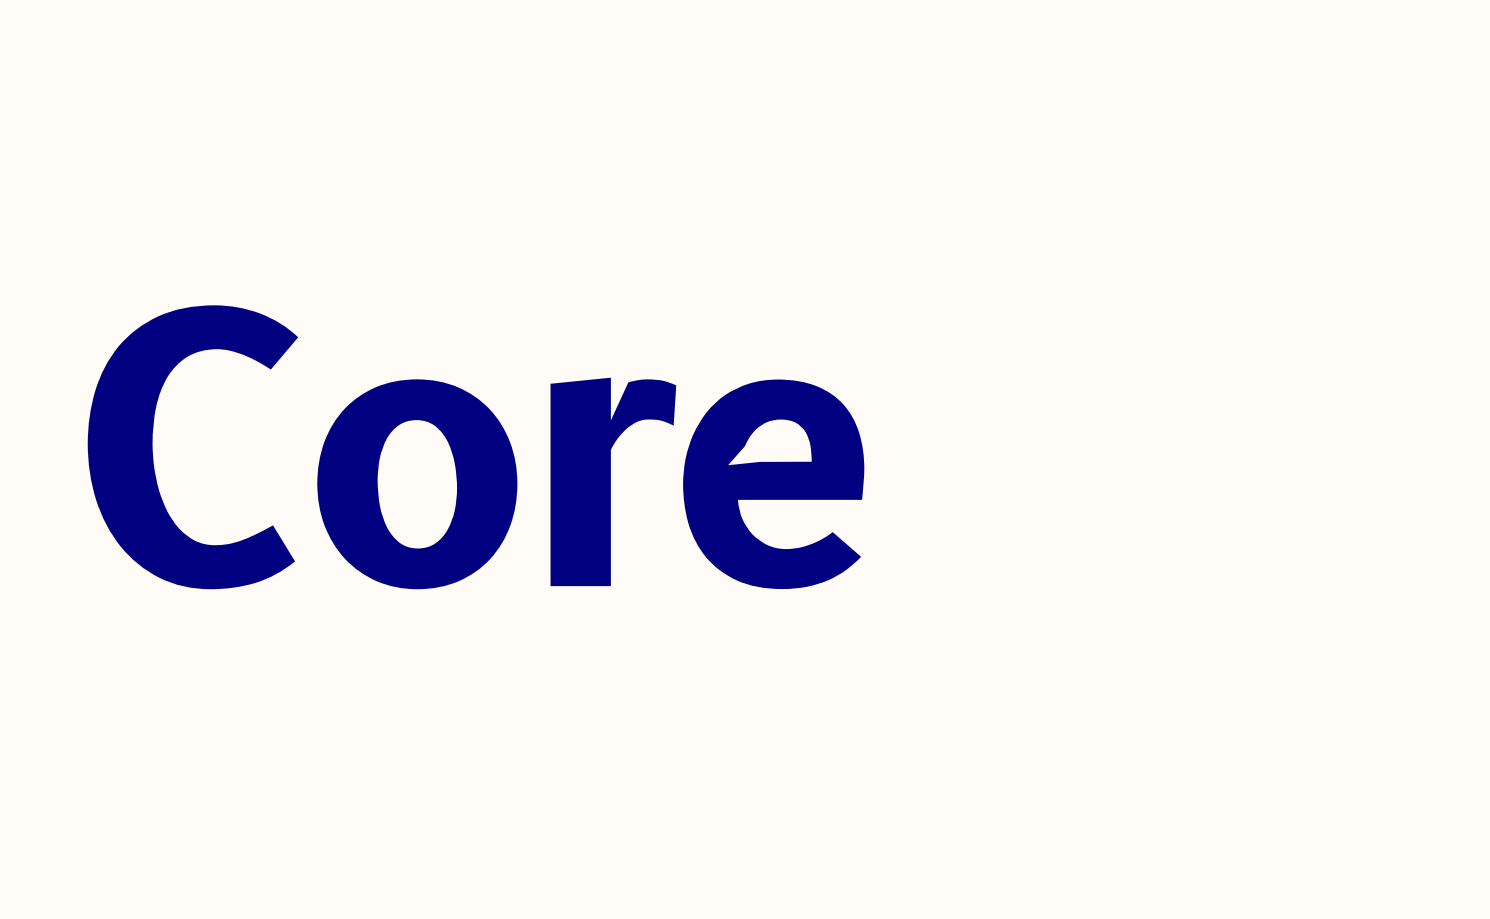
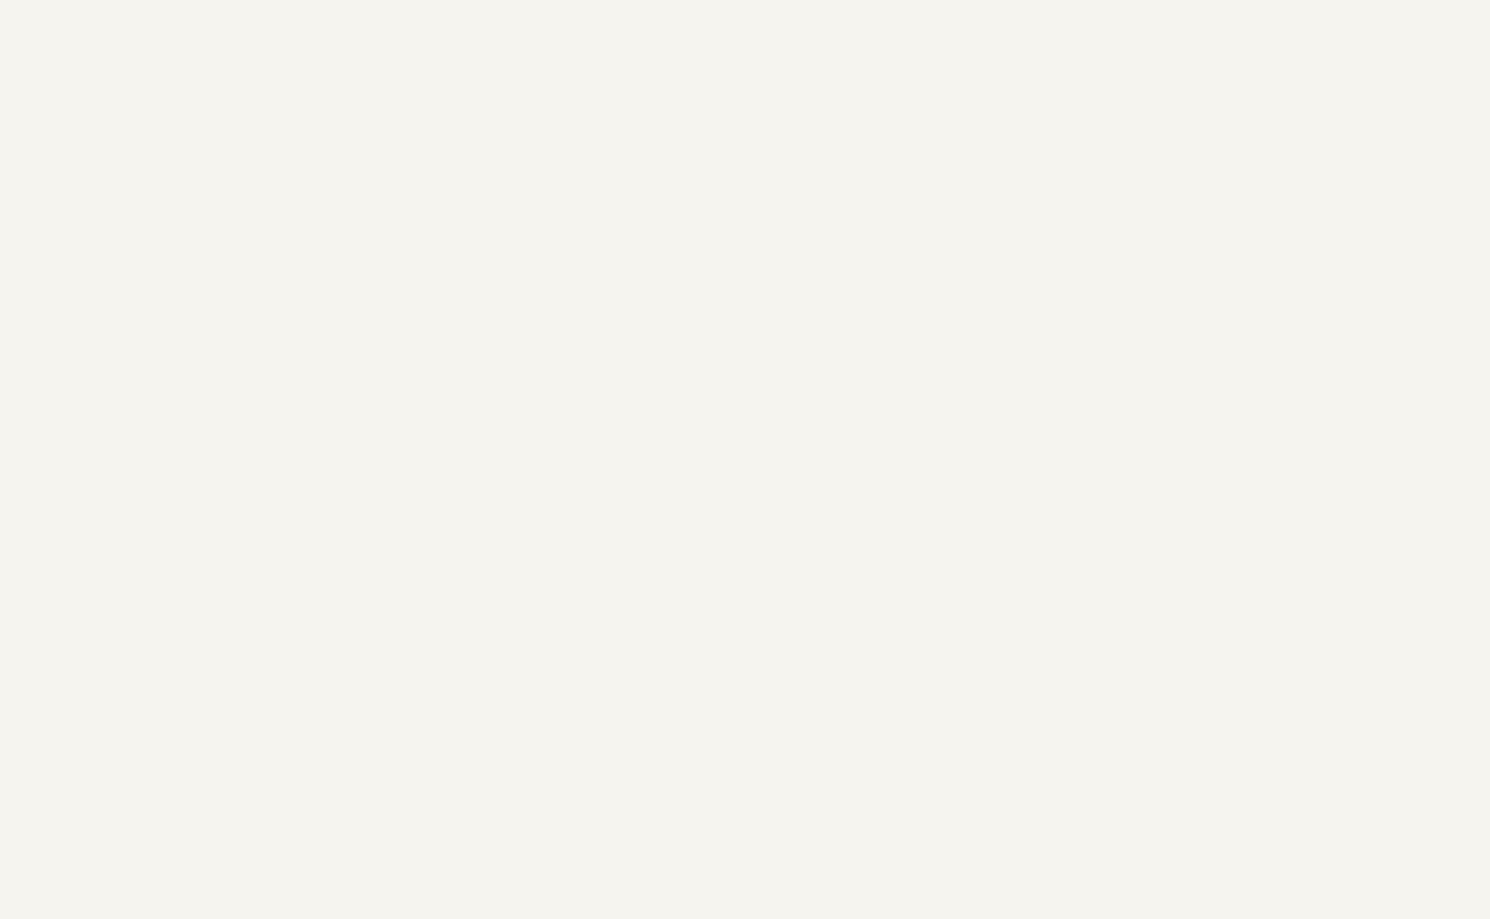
text: Core (476, 447) -> none

